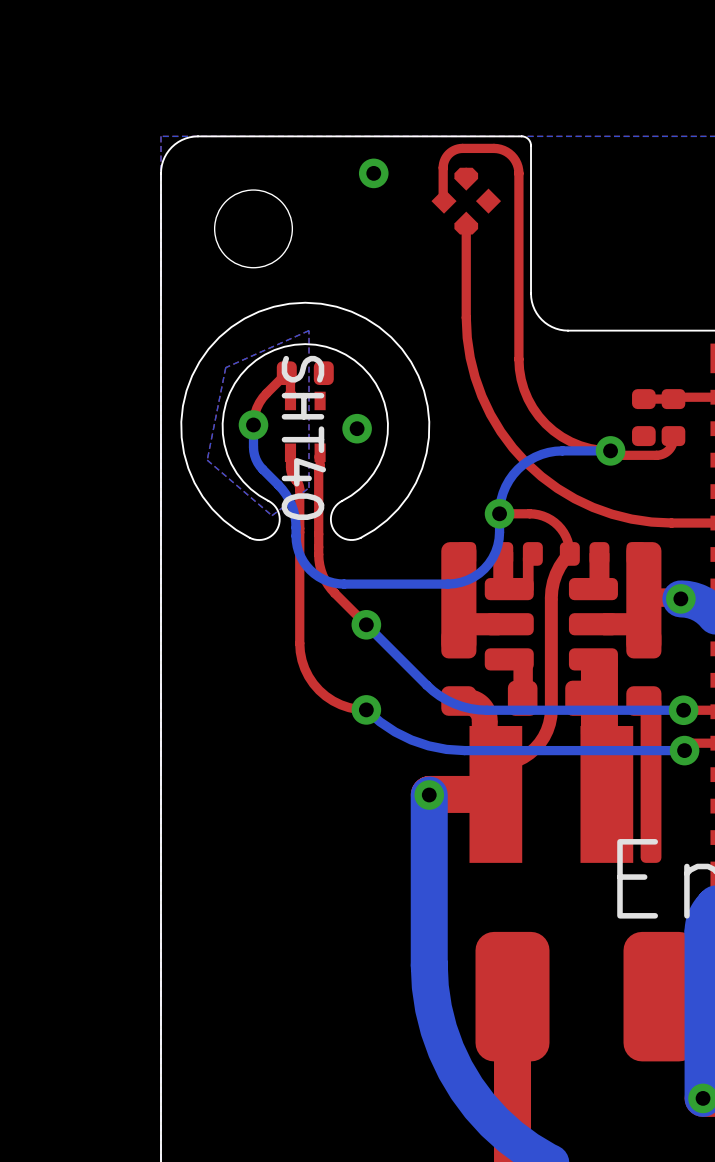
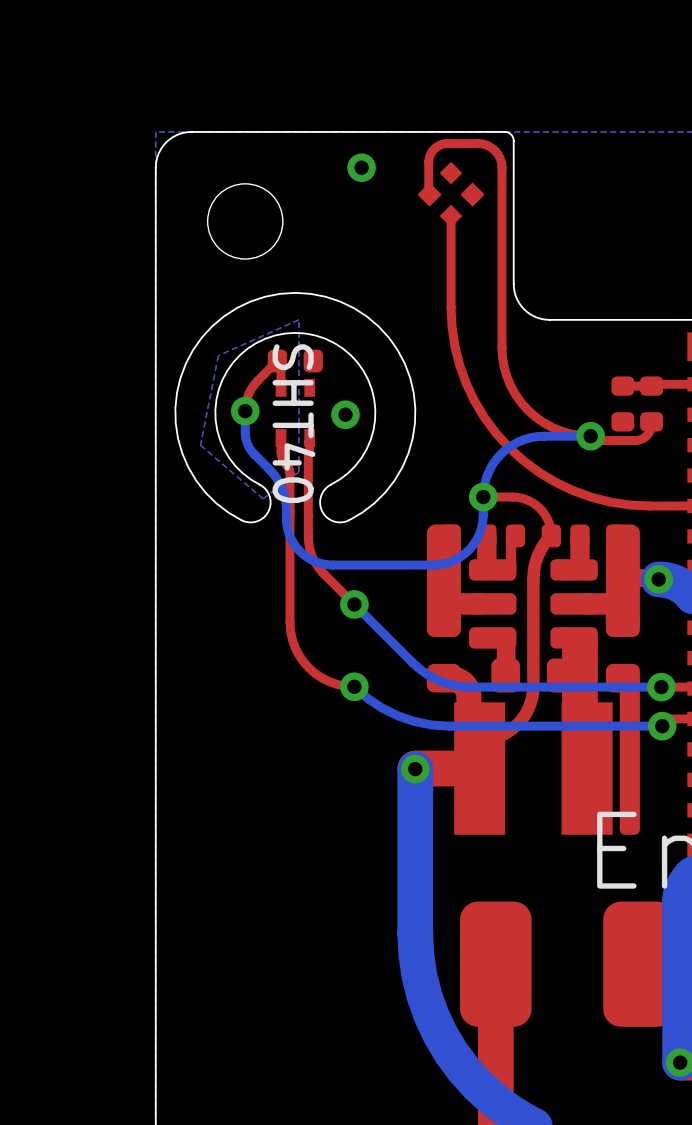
part footprint: [431, 167, 502, 235] -> [418, 162, 485, 227]

